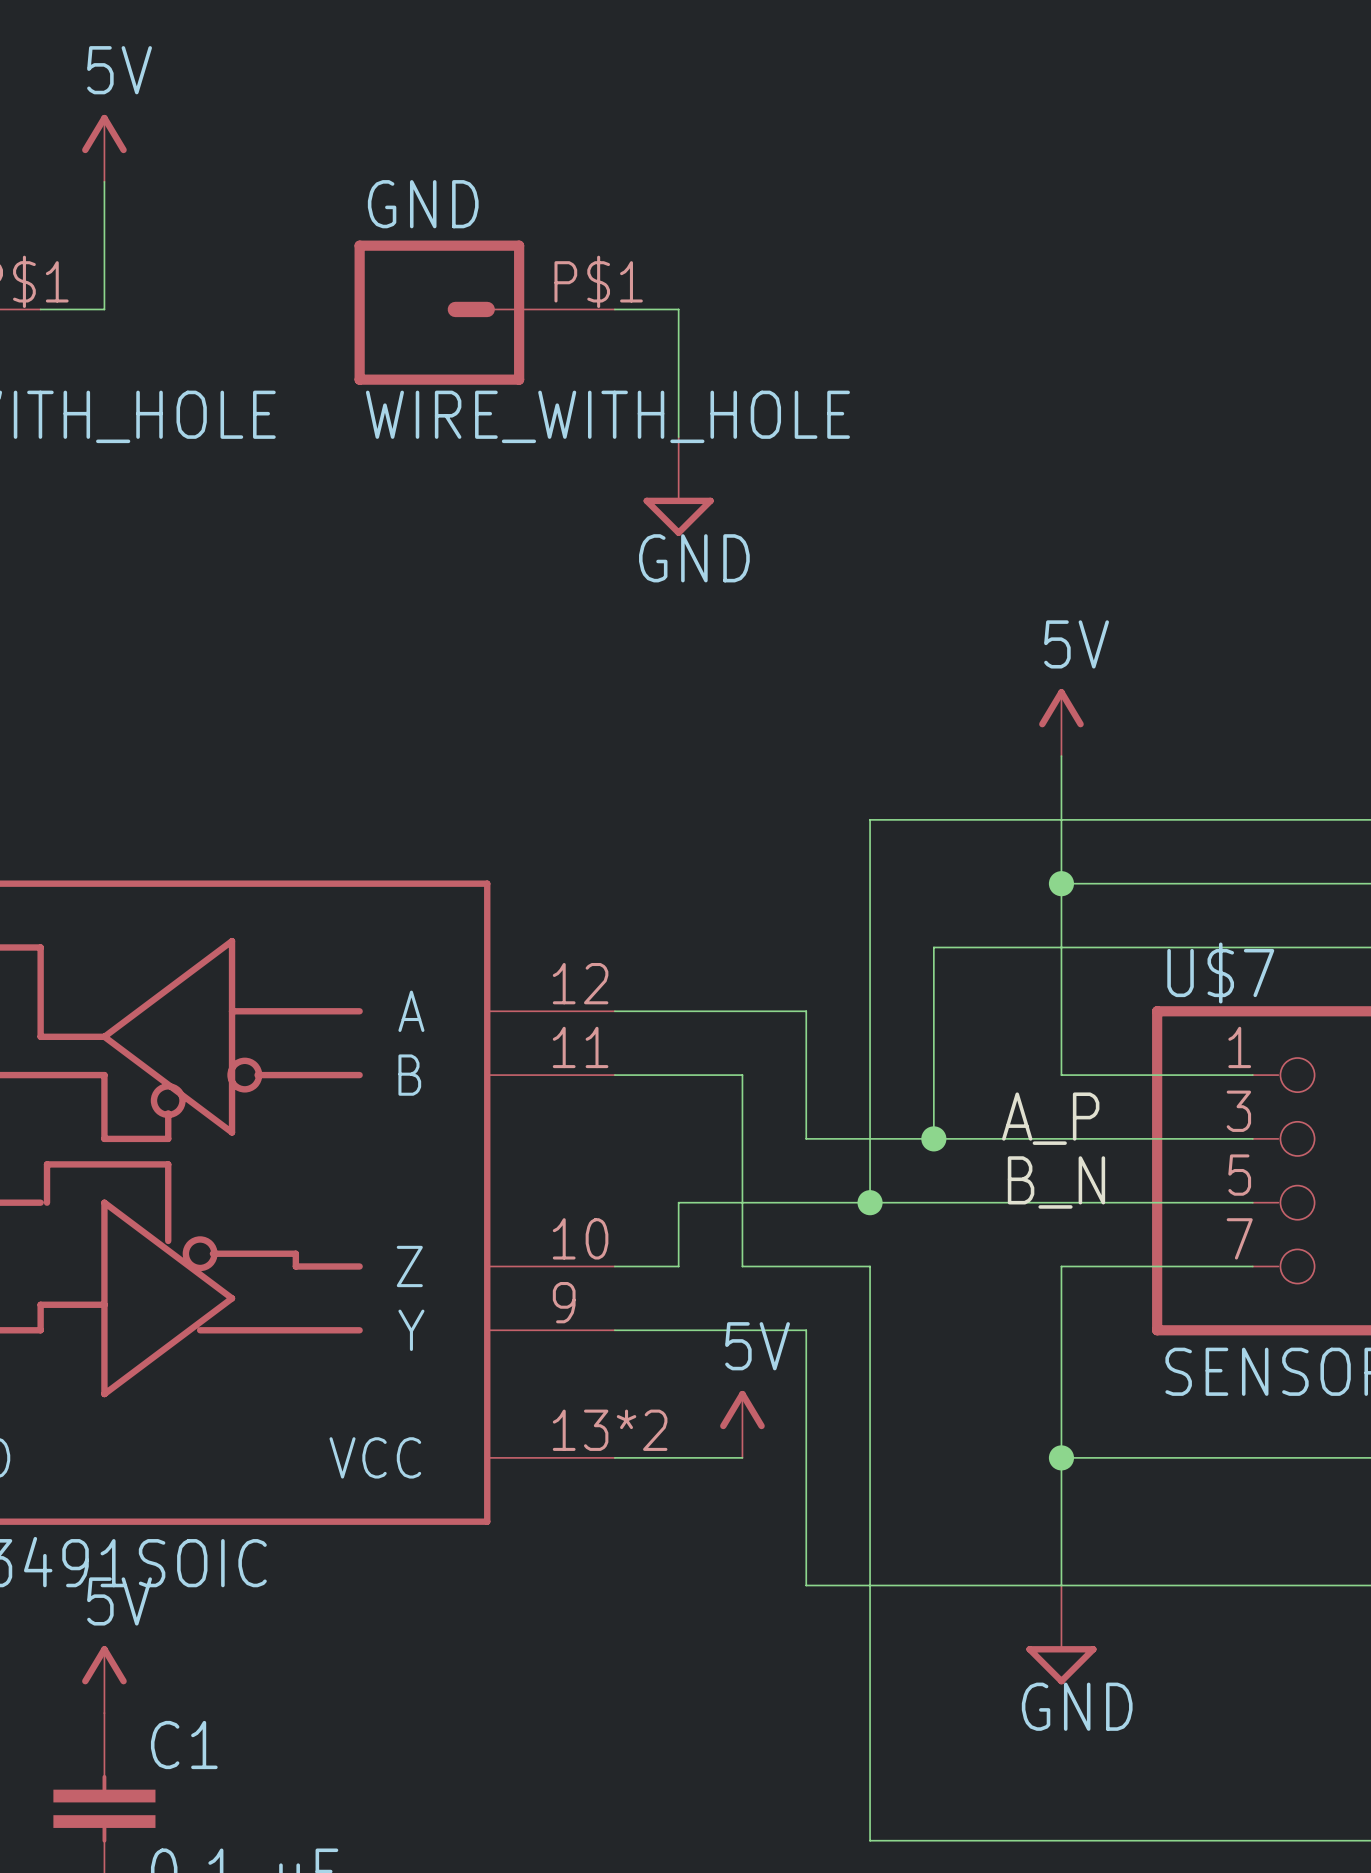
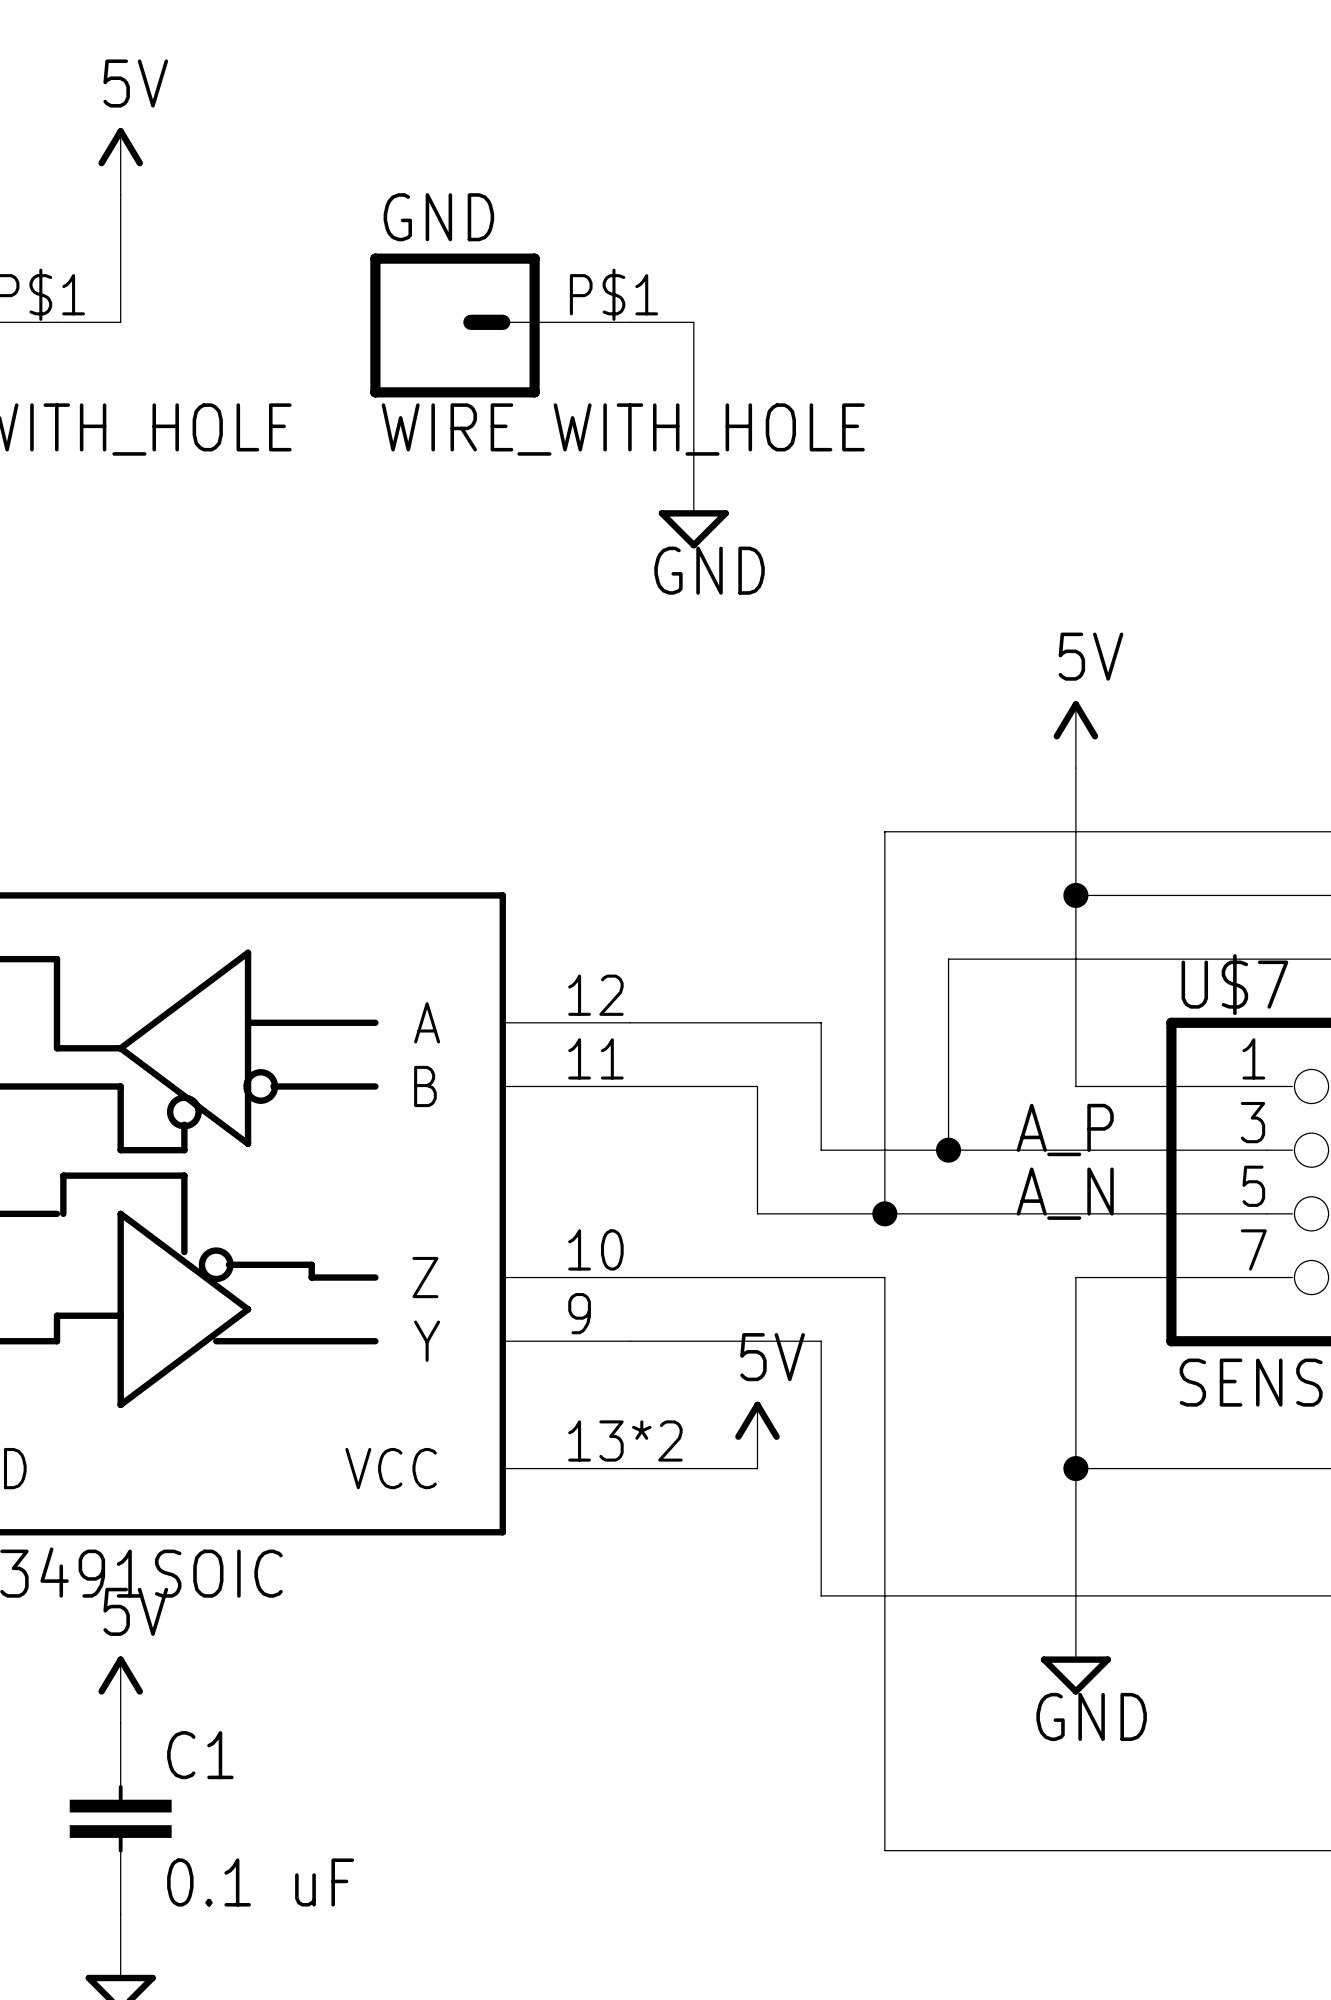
label: B_N (1056, 1182) -> A_N (1065, 1193)
wire: (678, 1266) (678, 1202) (742, 1202) (742, 1266) -> (693, 1277) (757, 1277)

